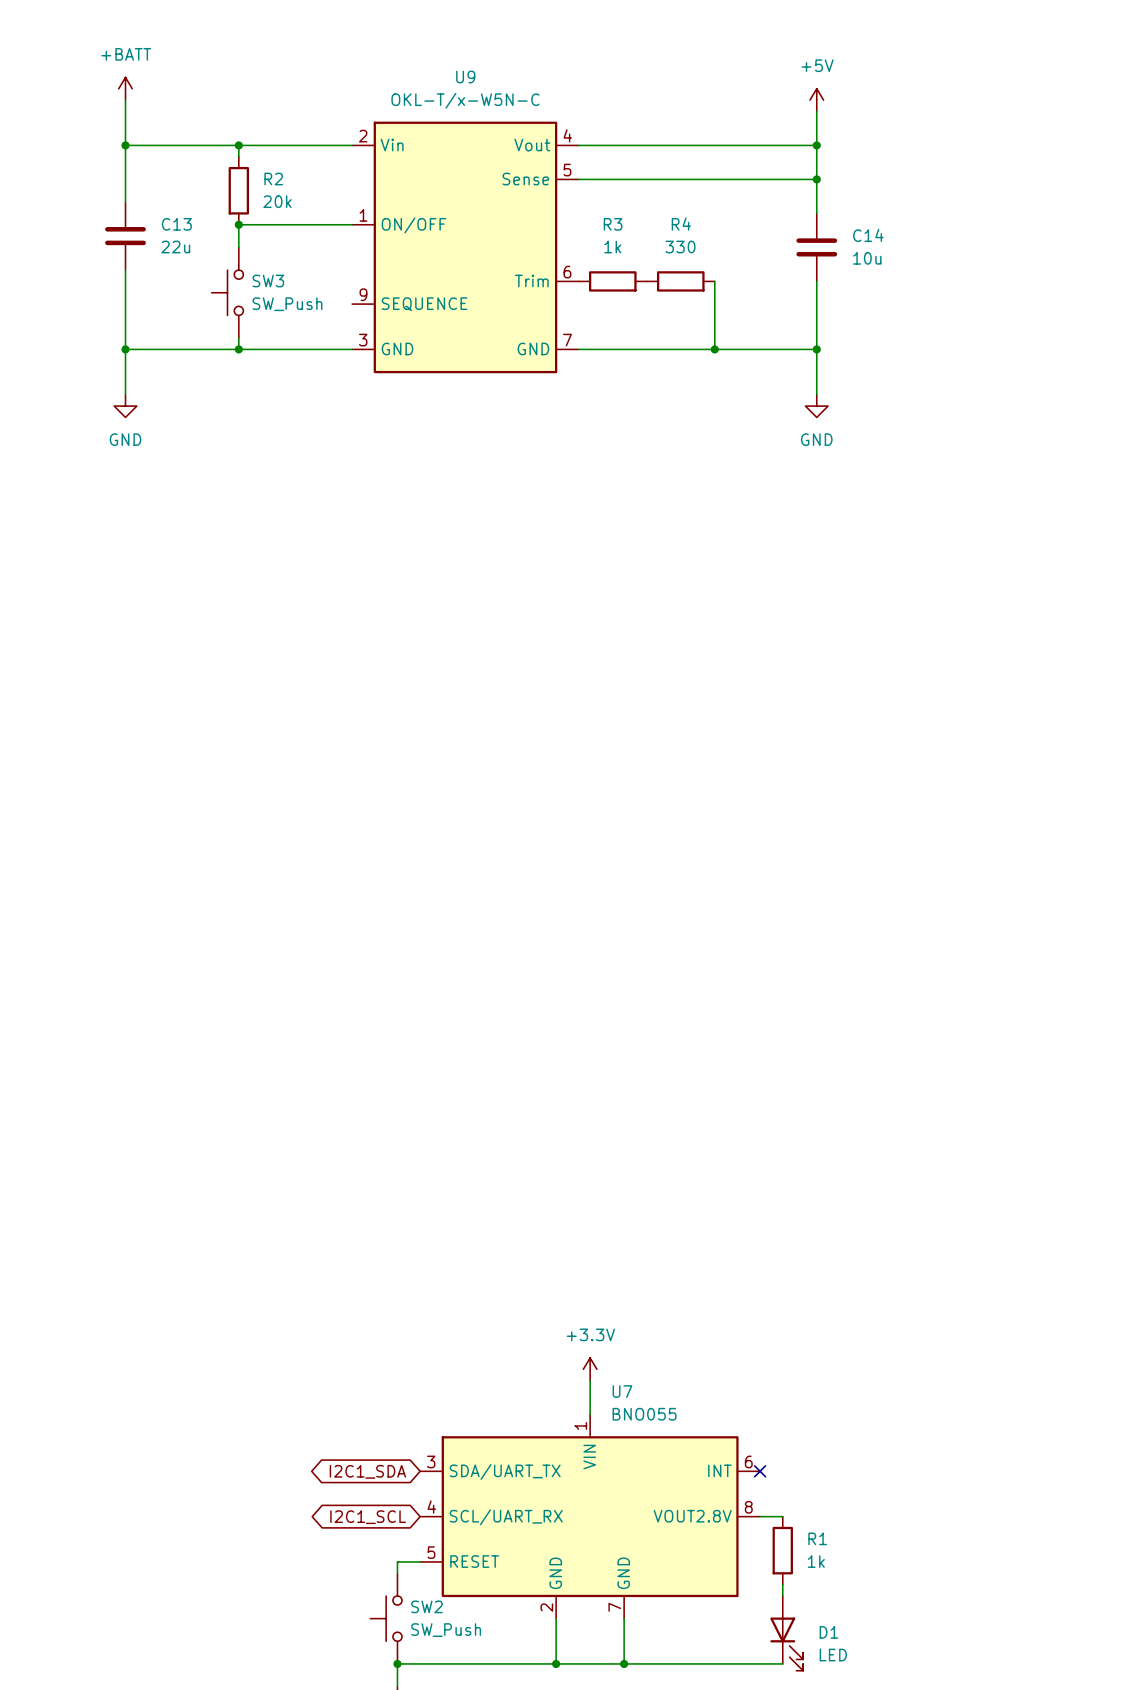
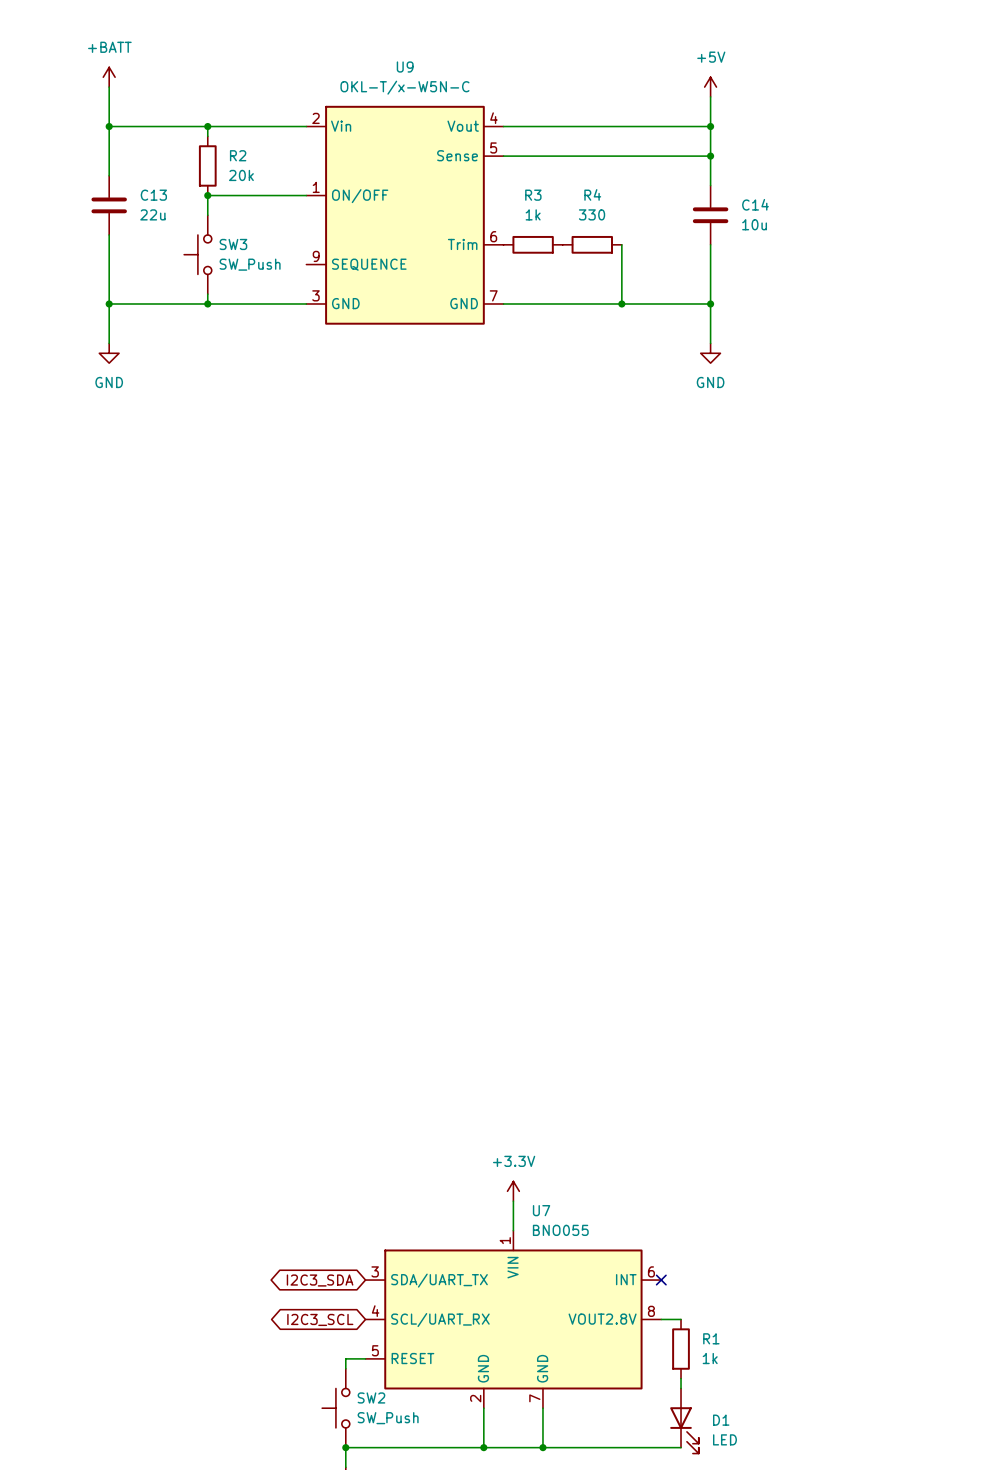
global label: I2C1_SDA (367, 1471) -> I2C3_SDA (320, 1280)
global label: I2C1_SCL (368, 1517) -> I2C3_SCL (320, 1319)

